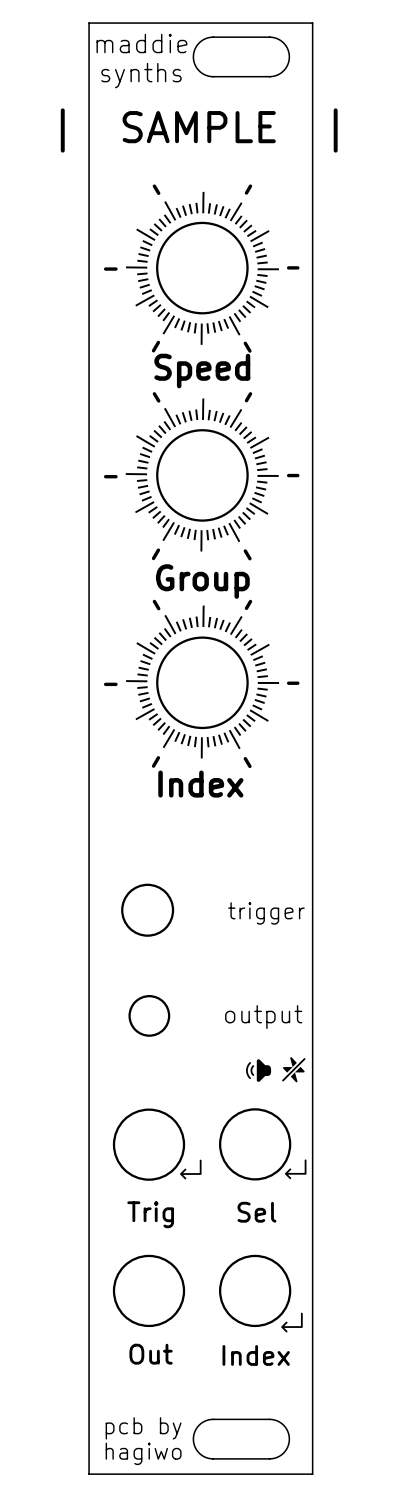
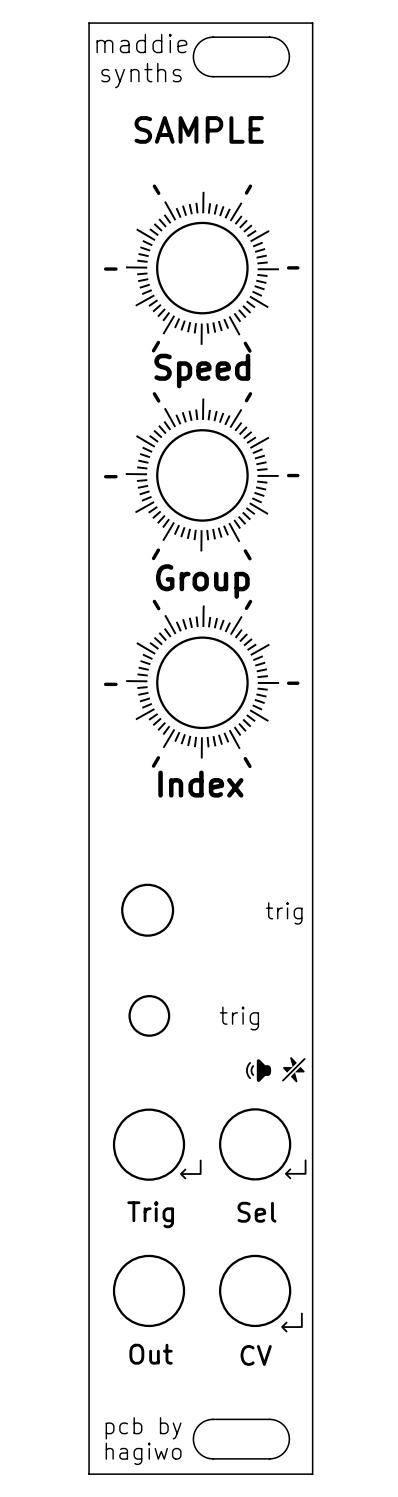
text: | SAMPLE | (199, 130) -> SAMPLE (199, 129)
text: trigger (266, 913) -> trig (284, 913)
text: output (263, 1017) -> none
text: none -> trig (239, 1018)
text: Index (256, 1355) -> CV (256, 1355)

